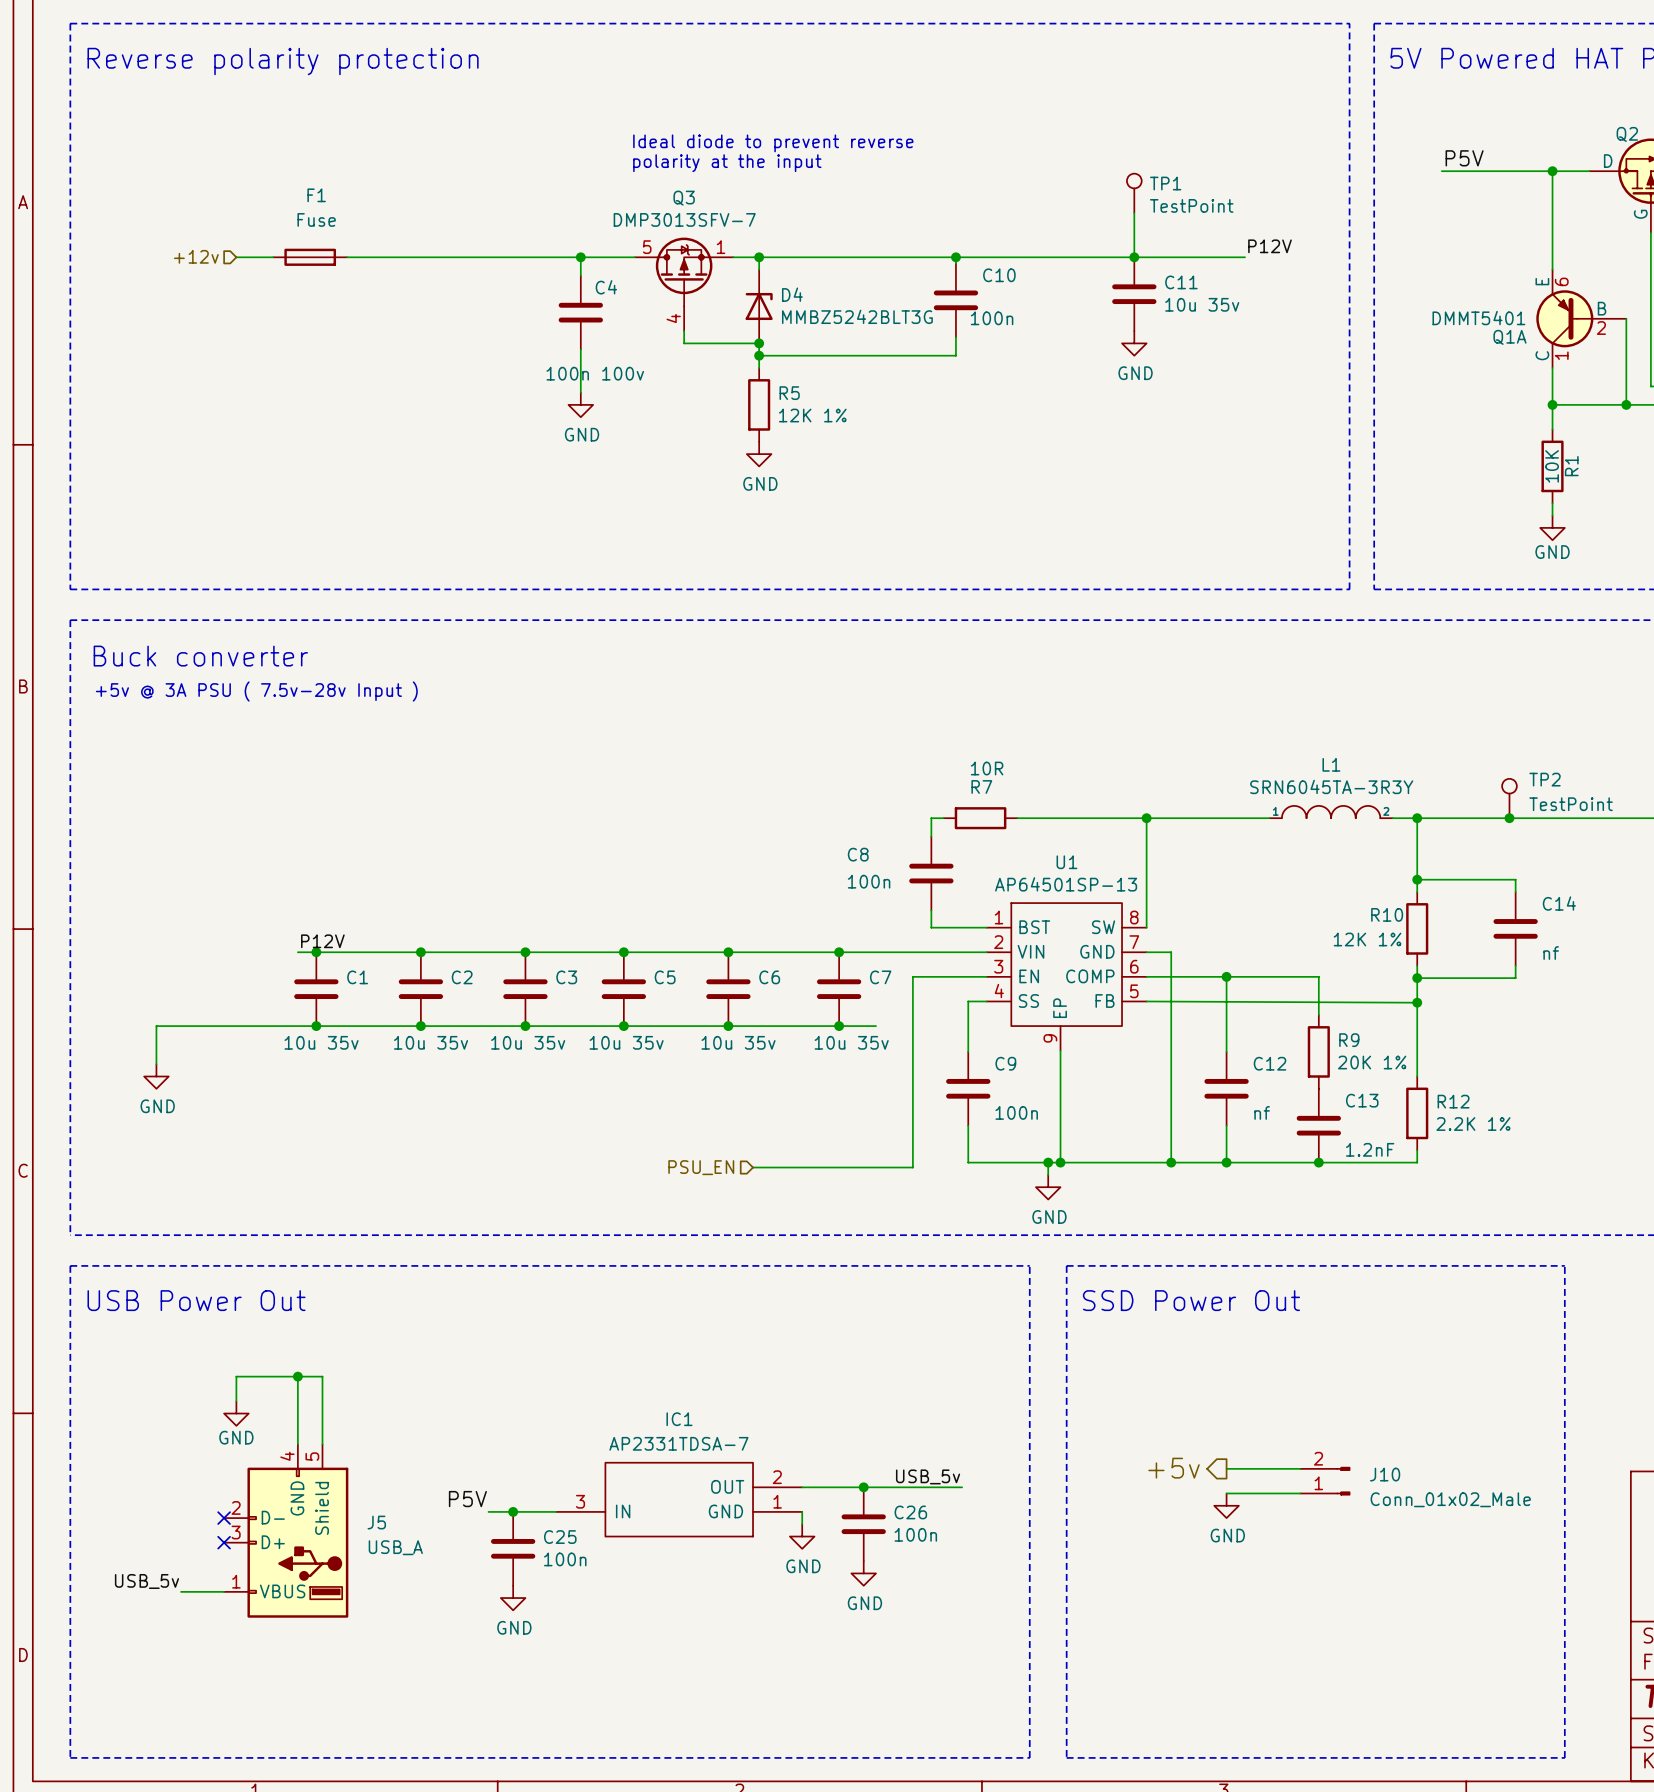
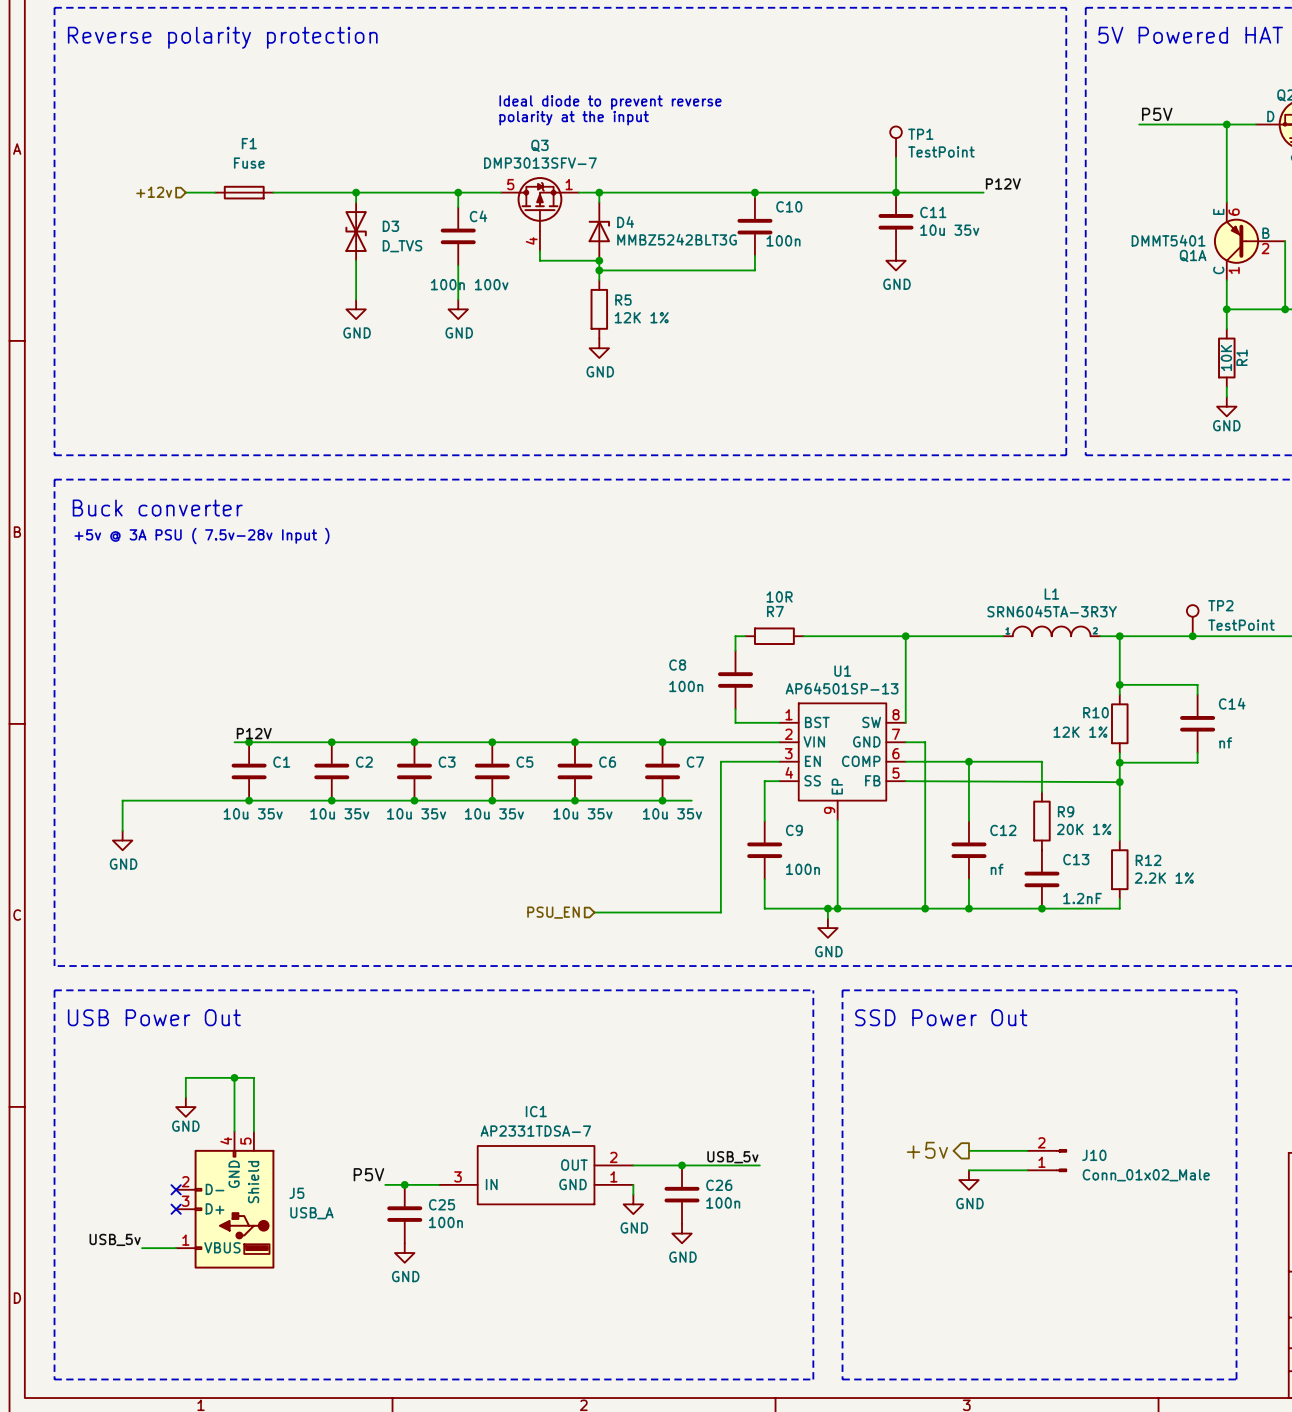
wire: none -> (356, 192) (356, 202)
junction: none -> (356, 192)
D3: none -> D_TVS (356, 231)
wire: none -> (356, 260) (356, 299)
power symbol: none -> GND (356, 309)

